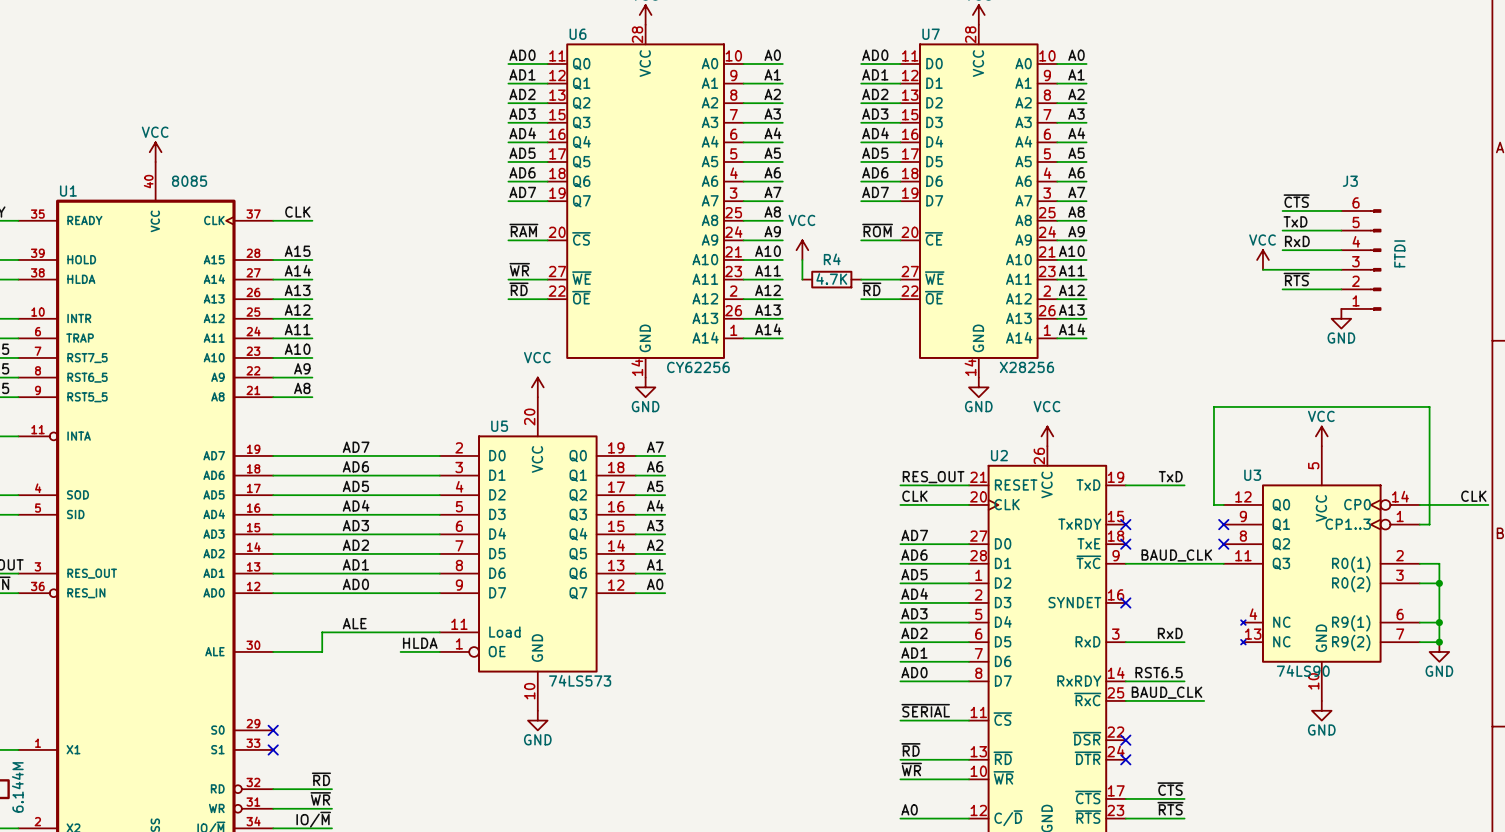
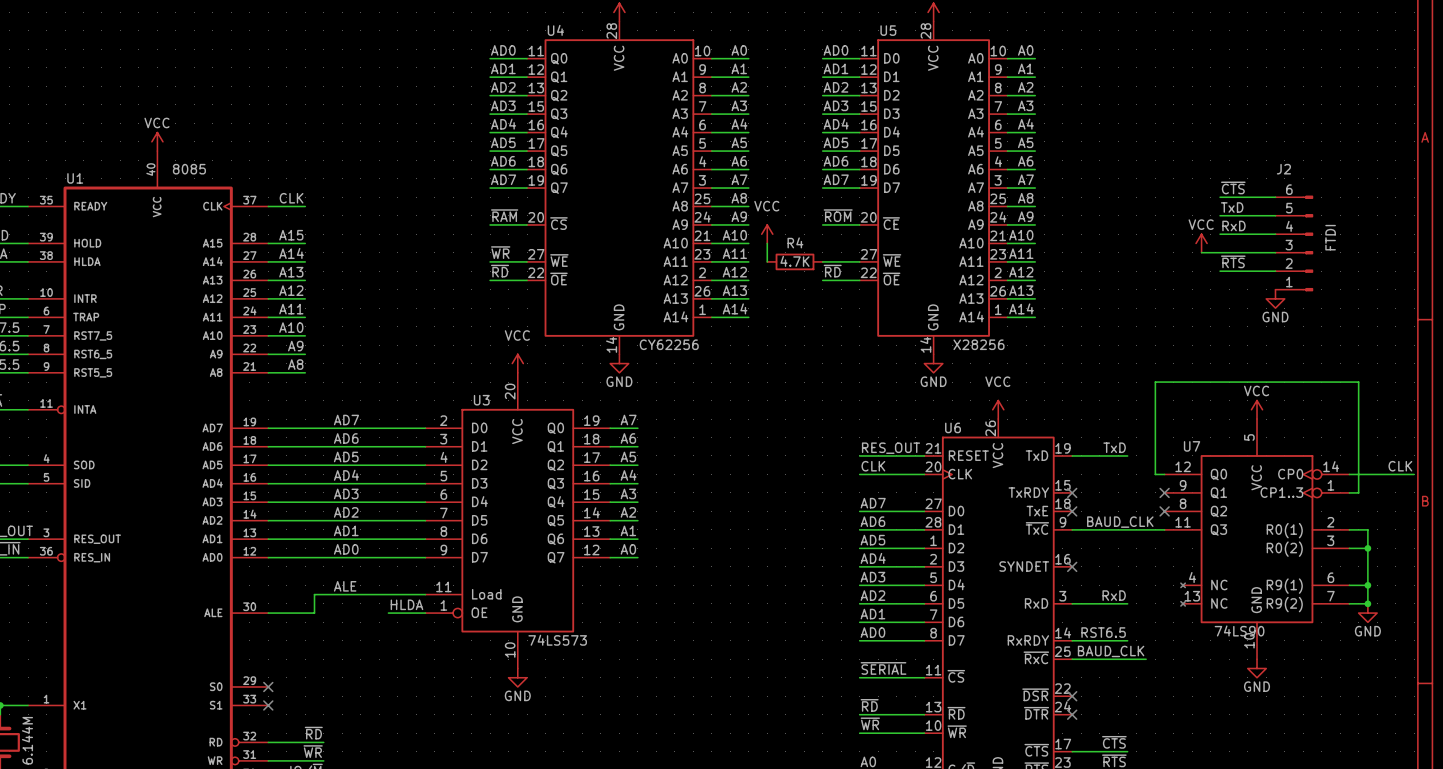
U6 name: U6 (578, 34) -> U4 (555, 30)
U7 name: U7 (931, 34) -> U5 (888, 30)
J3 name: J3 (1350, 181) -> J2 (1283, 169)
U5 name: U5 (499, 426) -> U3 (481, 400)
U2 name: U2 (999, 455) -> U6 (953, 427)
U3 name: U3 (1252, 475) -> U7 (1192, 446)

